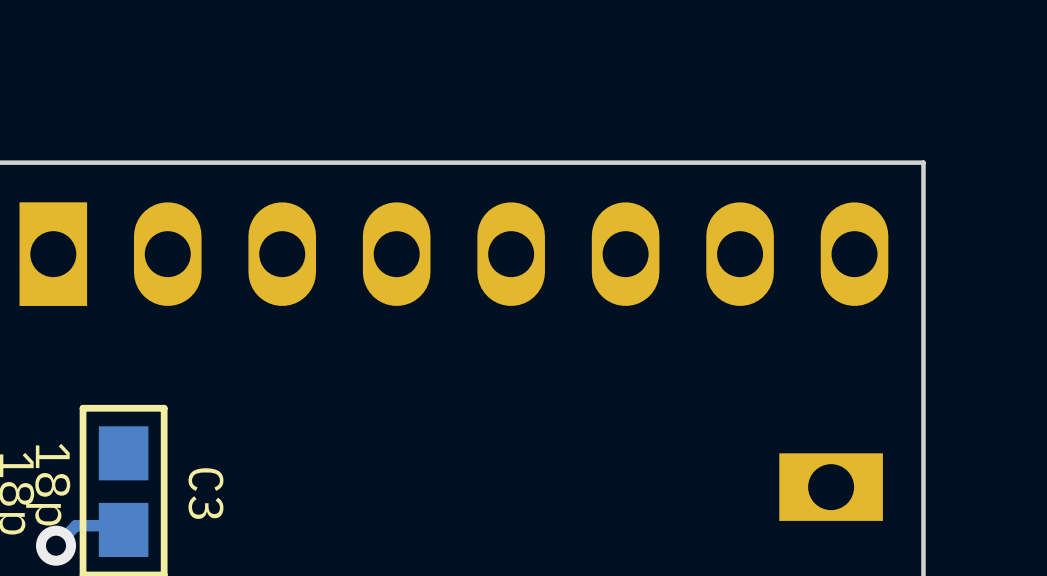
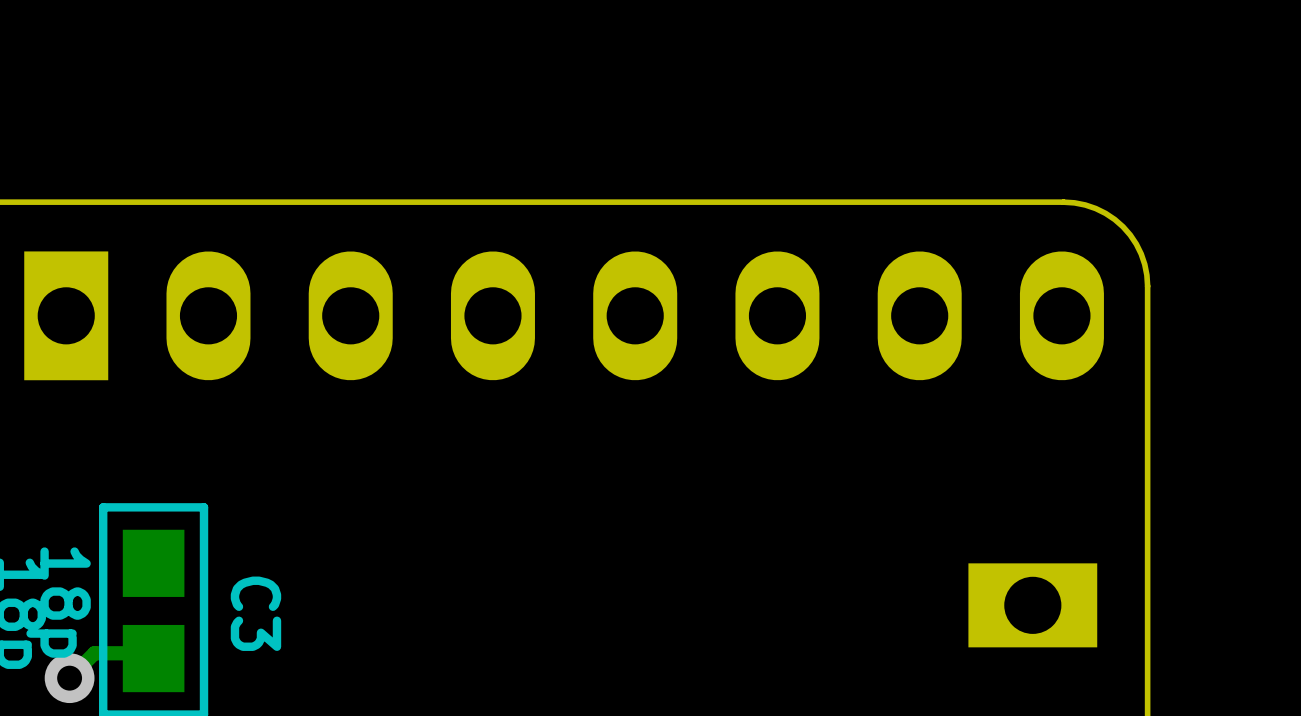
board edge: (855, 162) (923, 162) (923, 230) -> (1063, 202) (1095, 208) (1123, 226) (1141, 254) (1147, 286)

